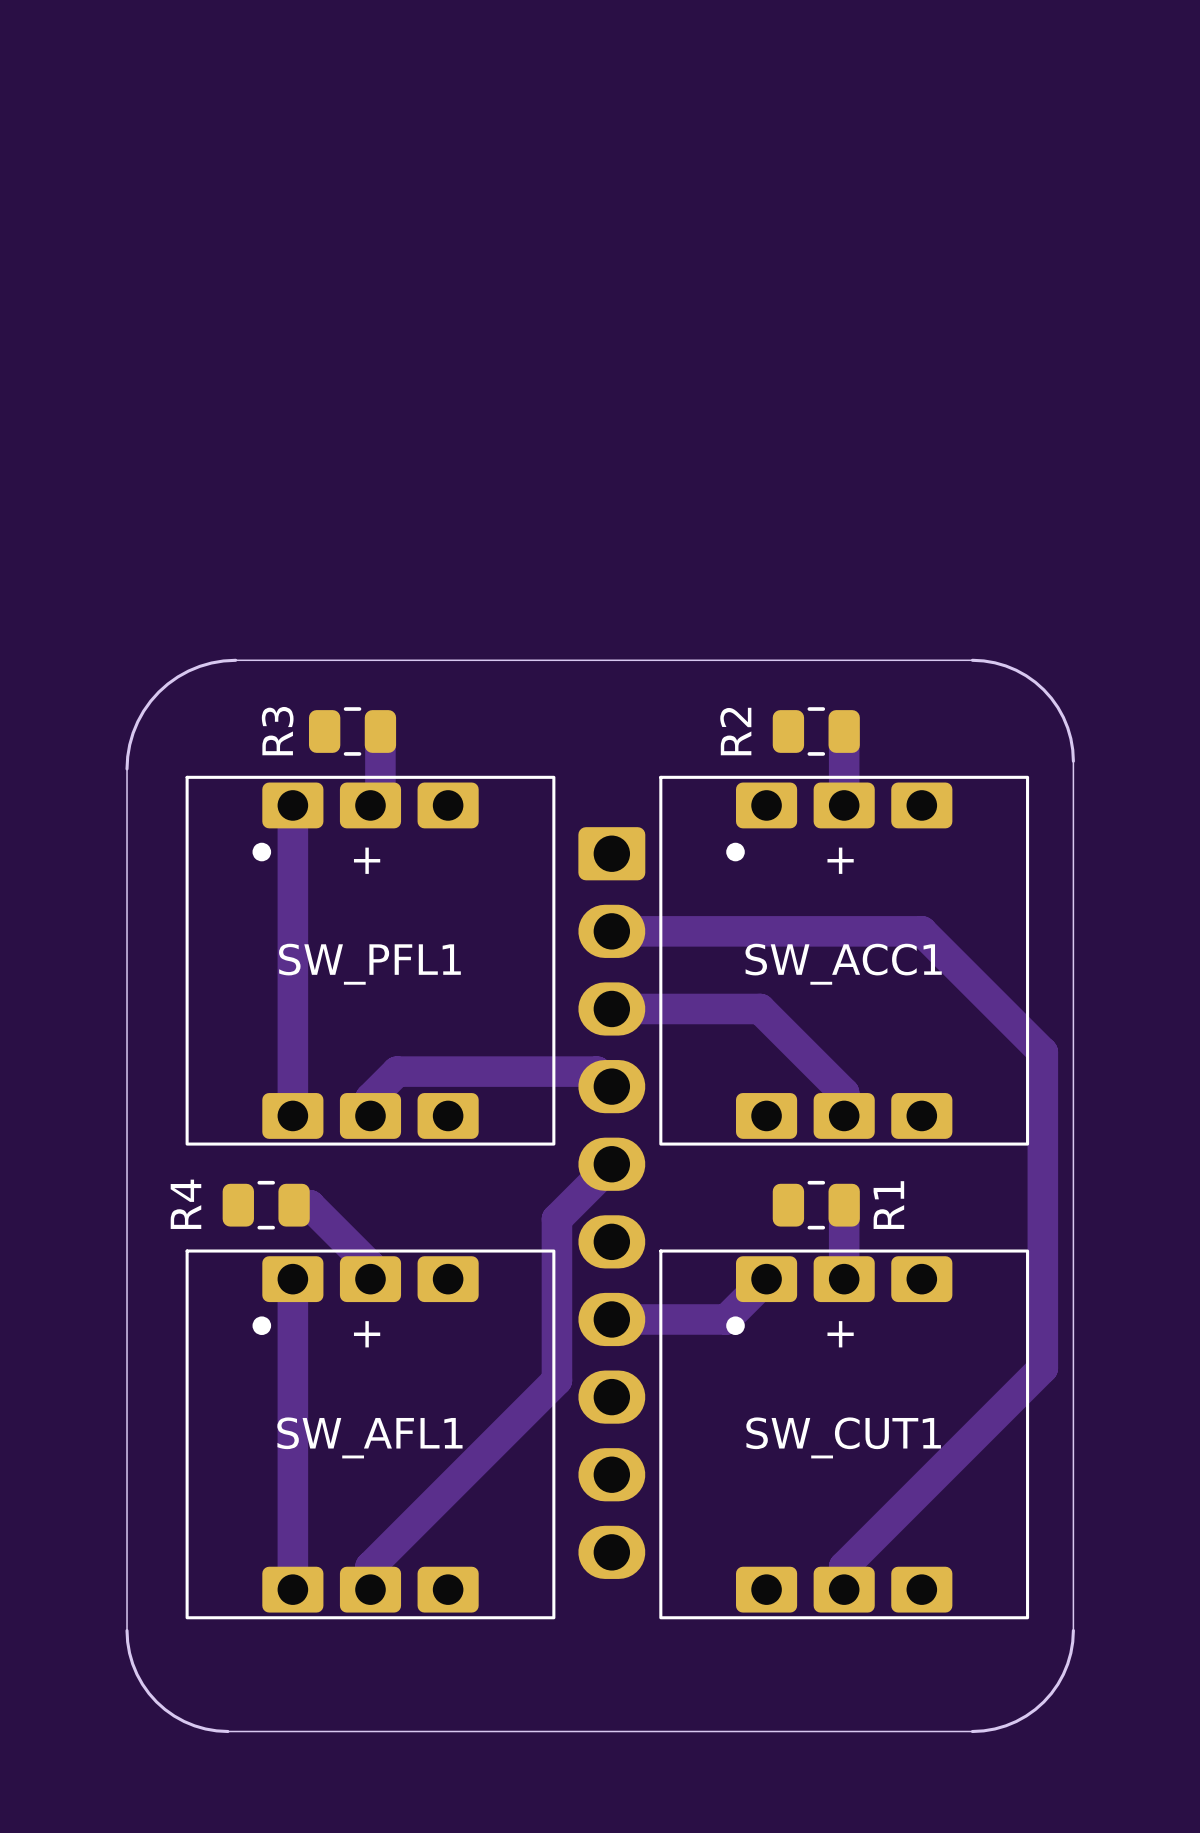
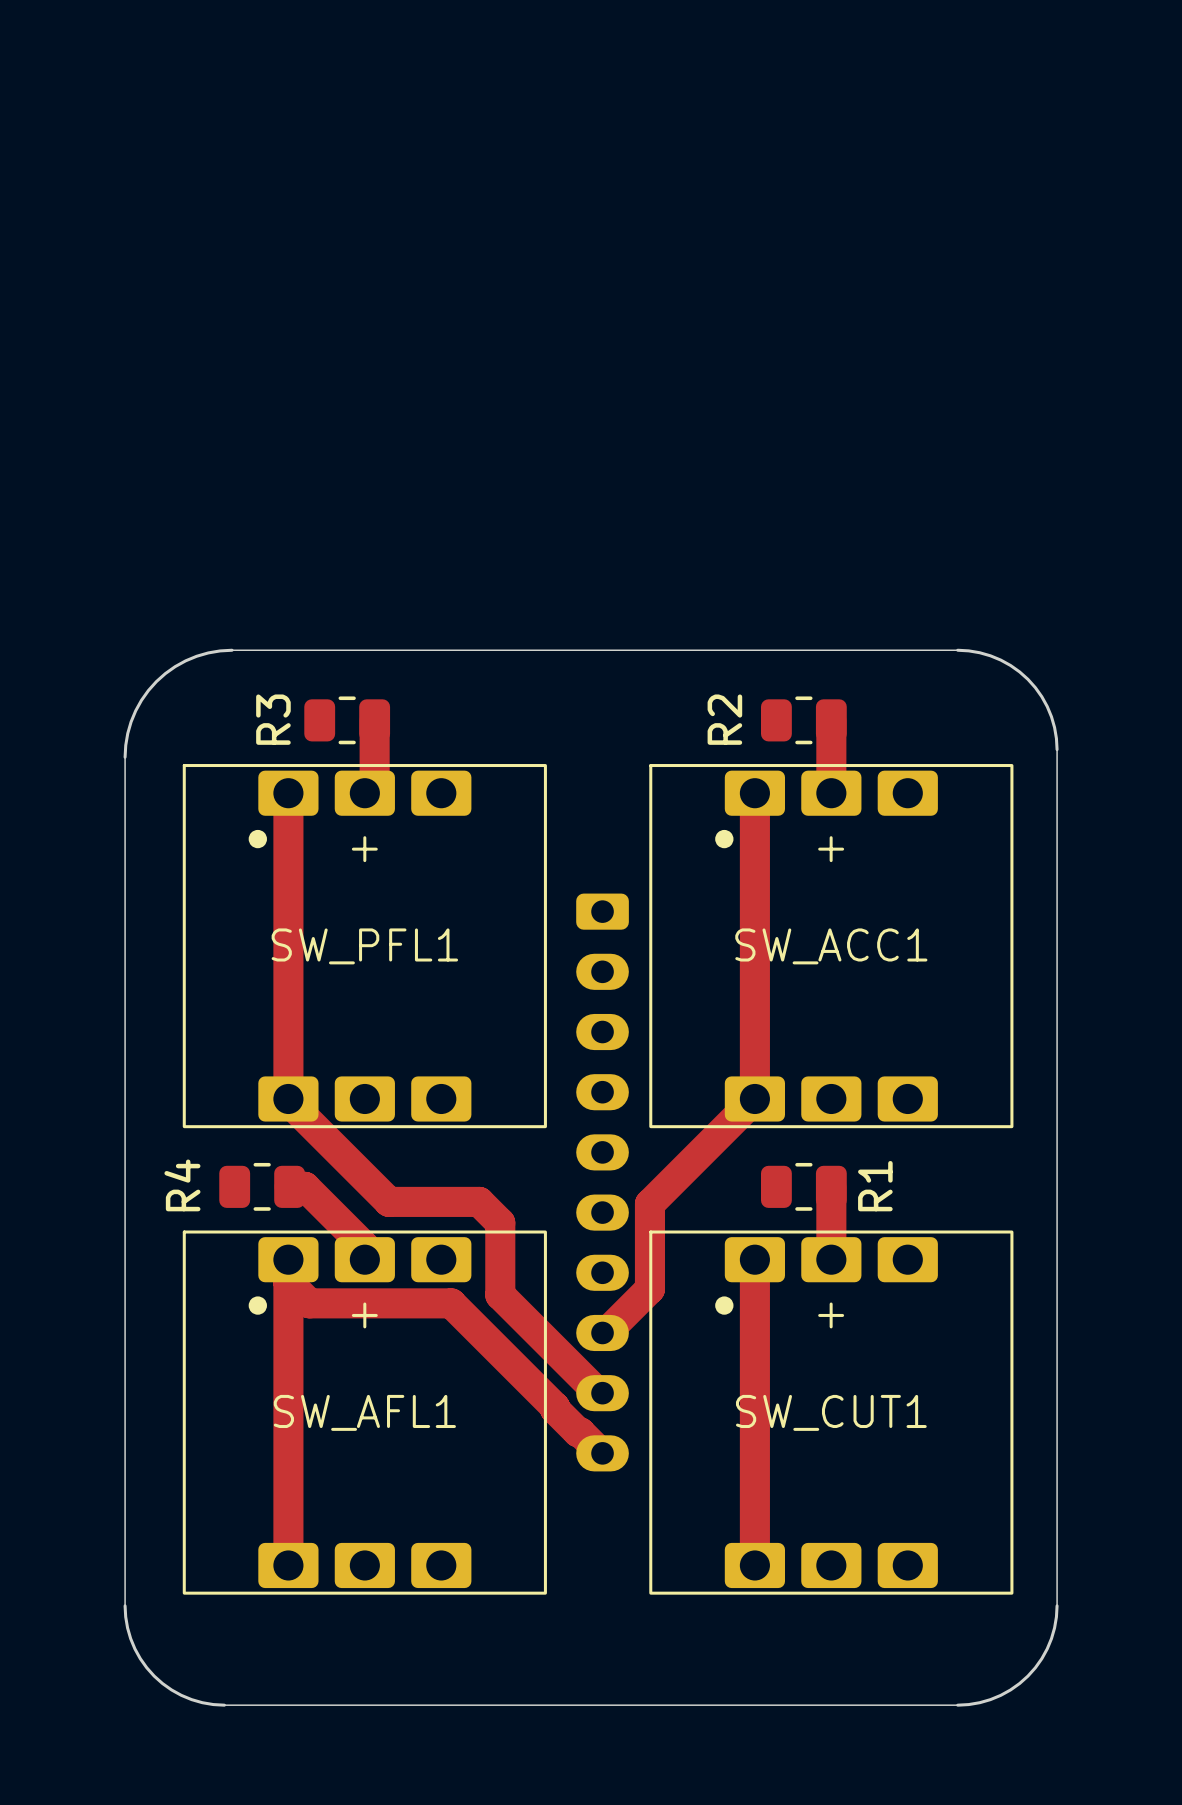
track: none -> (754, 793) (754, 1098) (649, 1203) (649, 1289) (605, 1332) (602, 1332)
part footprint: [578, 827, 646, 1579] -> [576, 893, 629, 1472]
track: (611, 931) (921, 931) (1042, 1052) (1042, 1368) (844, 1566) (844, 1589) -> none
track: (611, 1008) (760, 1008) (844, 1093) (844, 1115) -> none
track: (611, 1086) (596, 1071) (397, 1071) (370, 1098) (370, 1115) -> none
track: none -> (288, 1098) (288, 1101) (389, 1201) (479, 1201) (500, 1222) (500, 1295) (598, 1393) (602, 1393)
track: (611, 1164) (556, 1219) (556, 1380) (370, 1566) (370, 1589) -> none
track: (766, 1279) (726, 1319) (611, 1319) -> (754, 1259) (754, 1565)
track: none -> (288, 1282) (309, 1303) (451, 1303) (578, 1432) (602, 1453)

